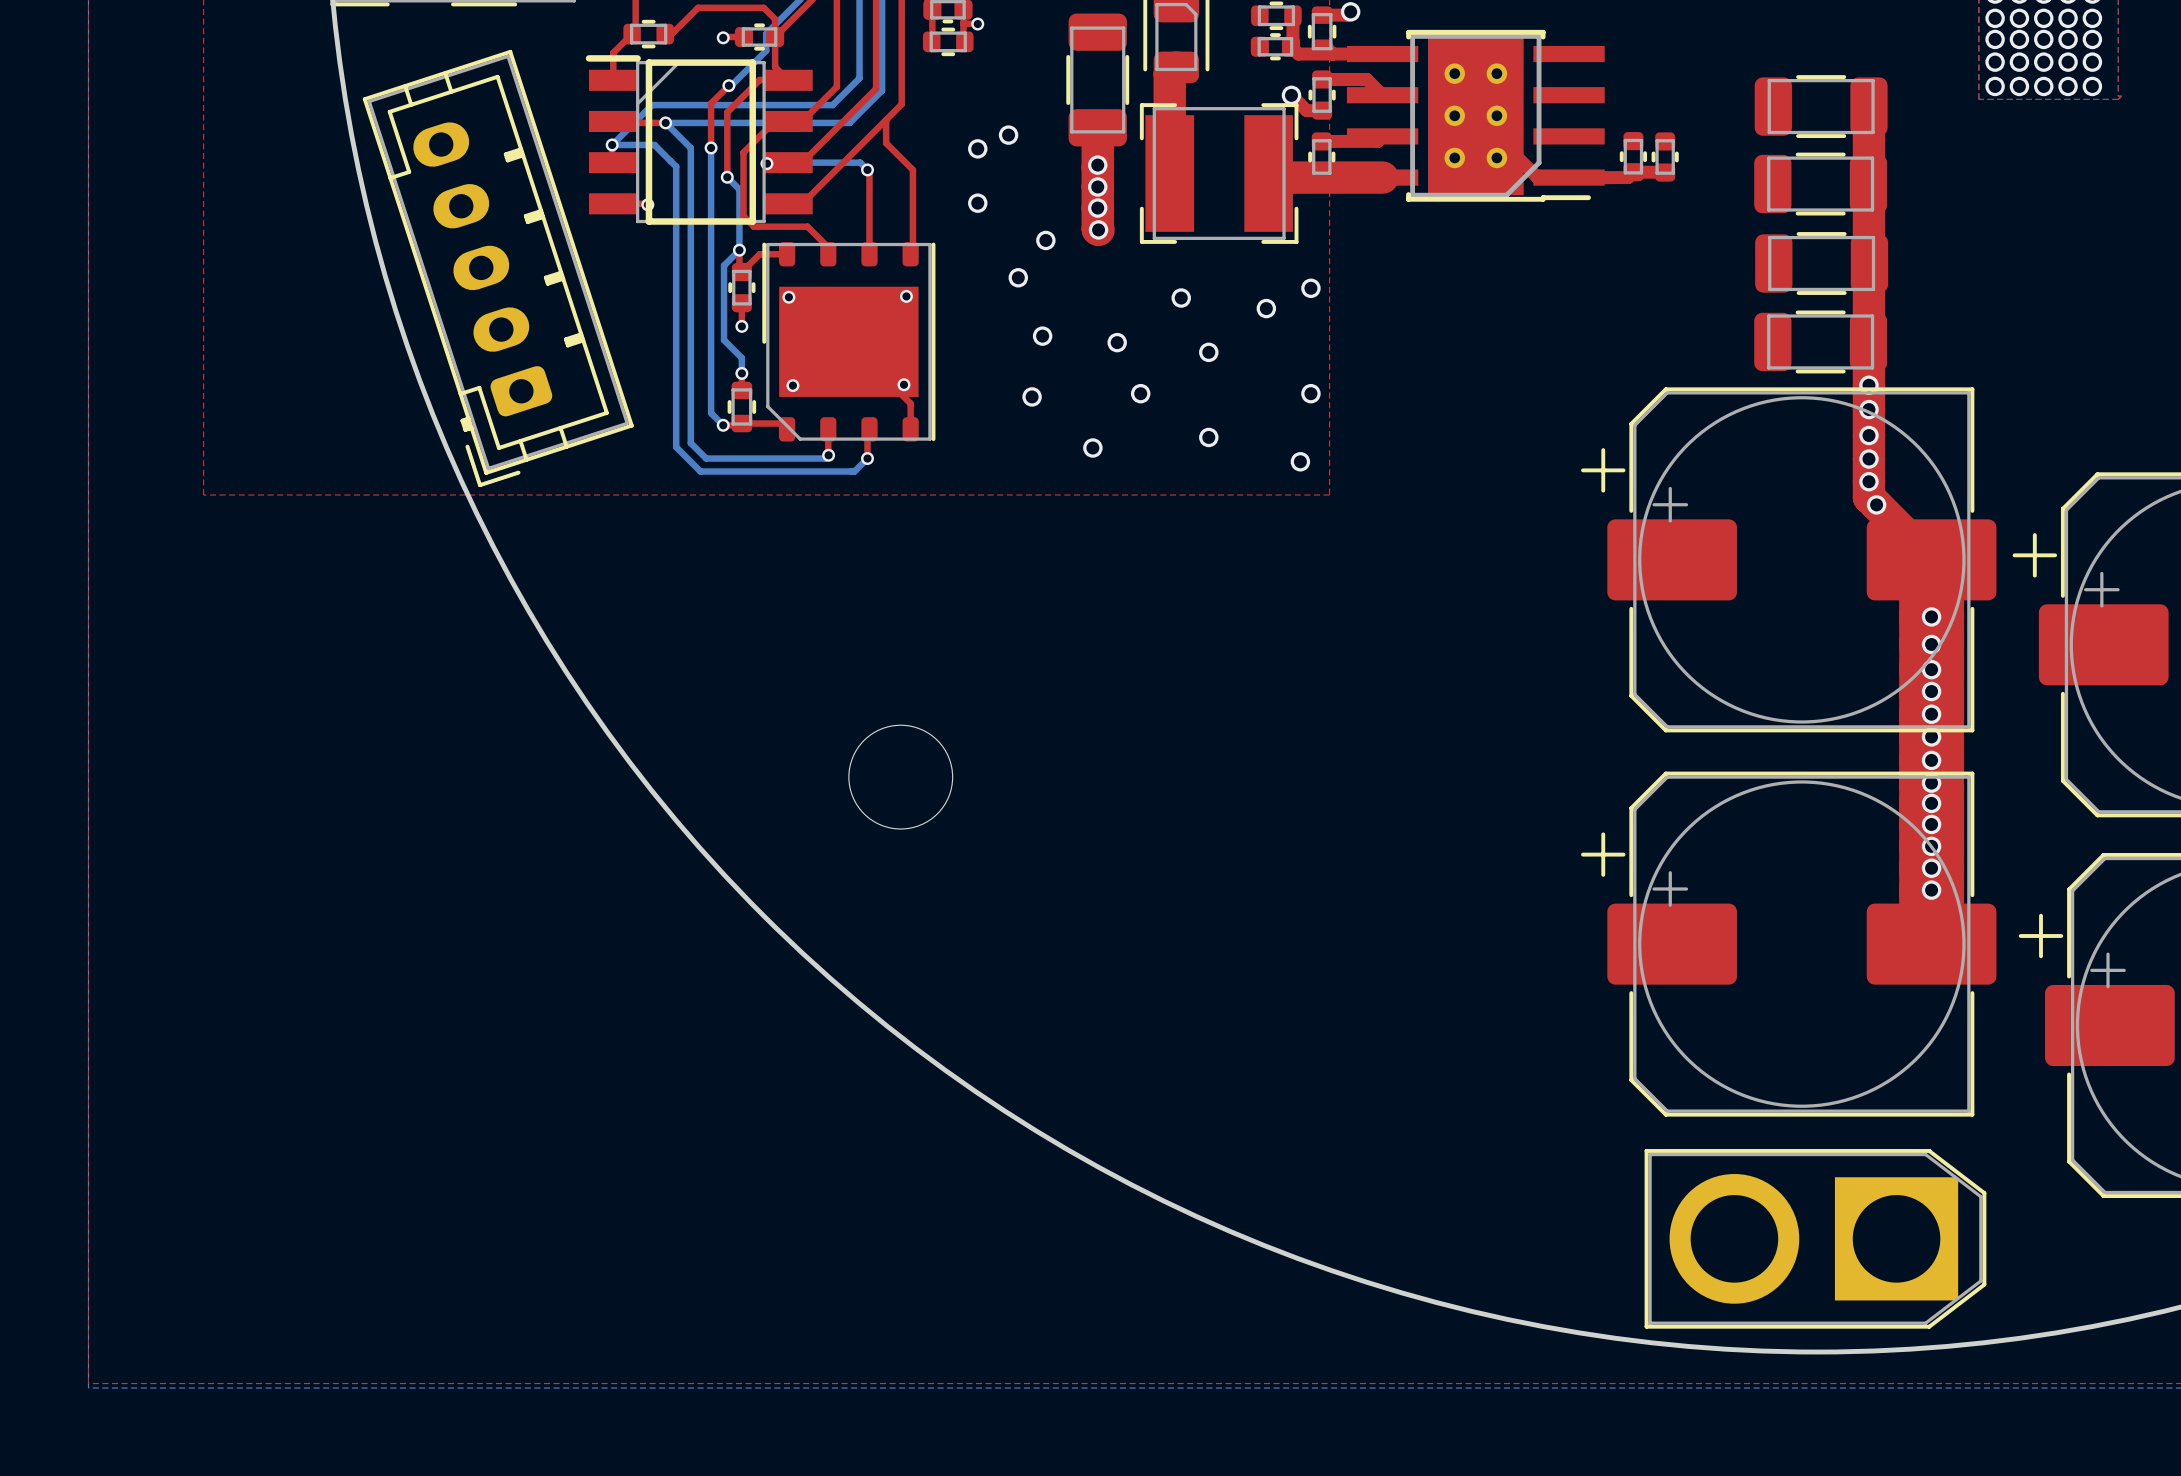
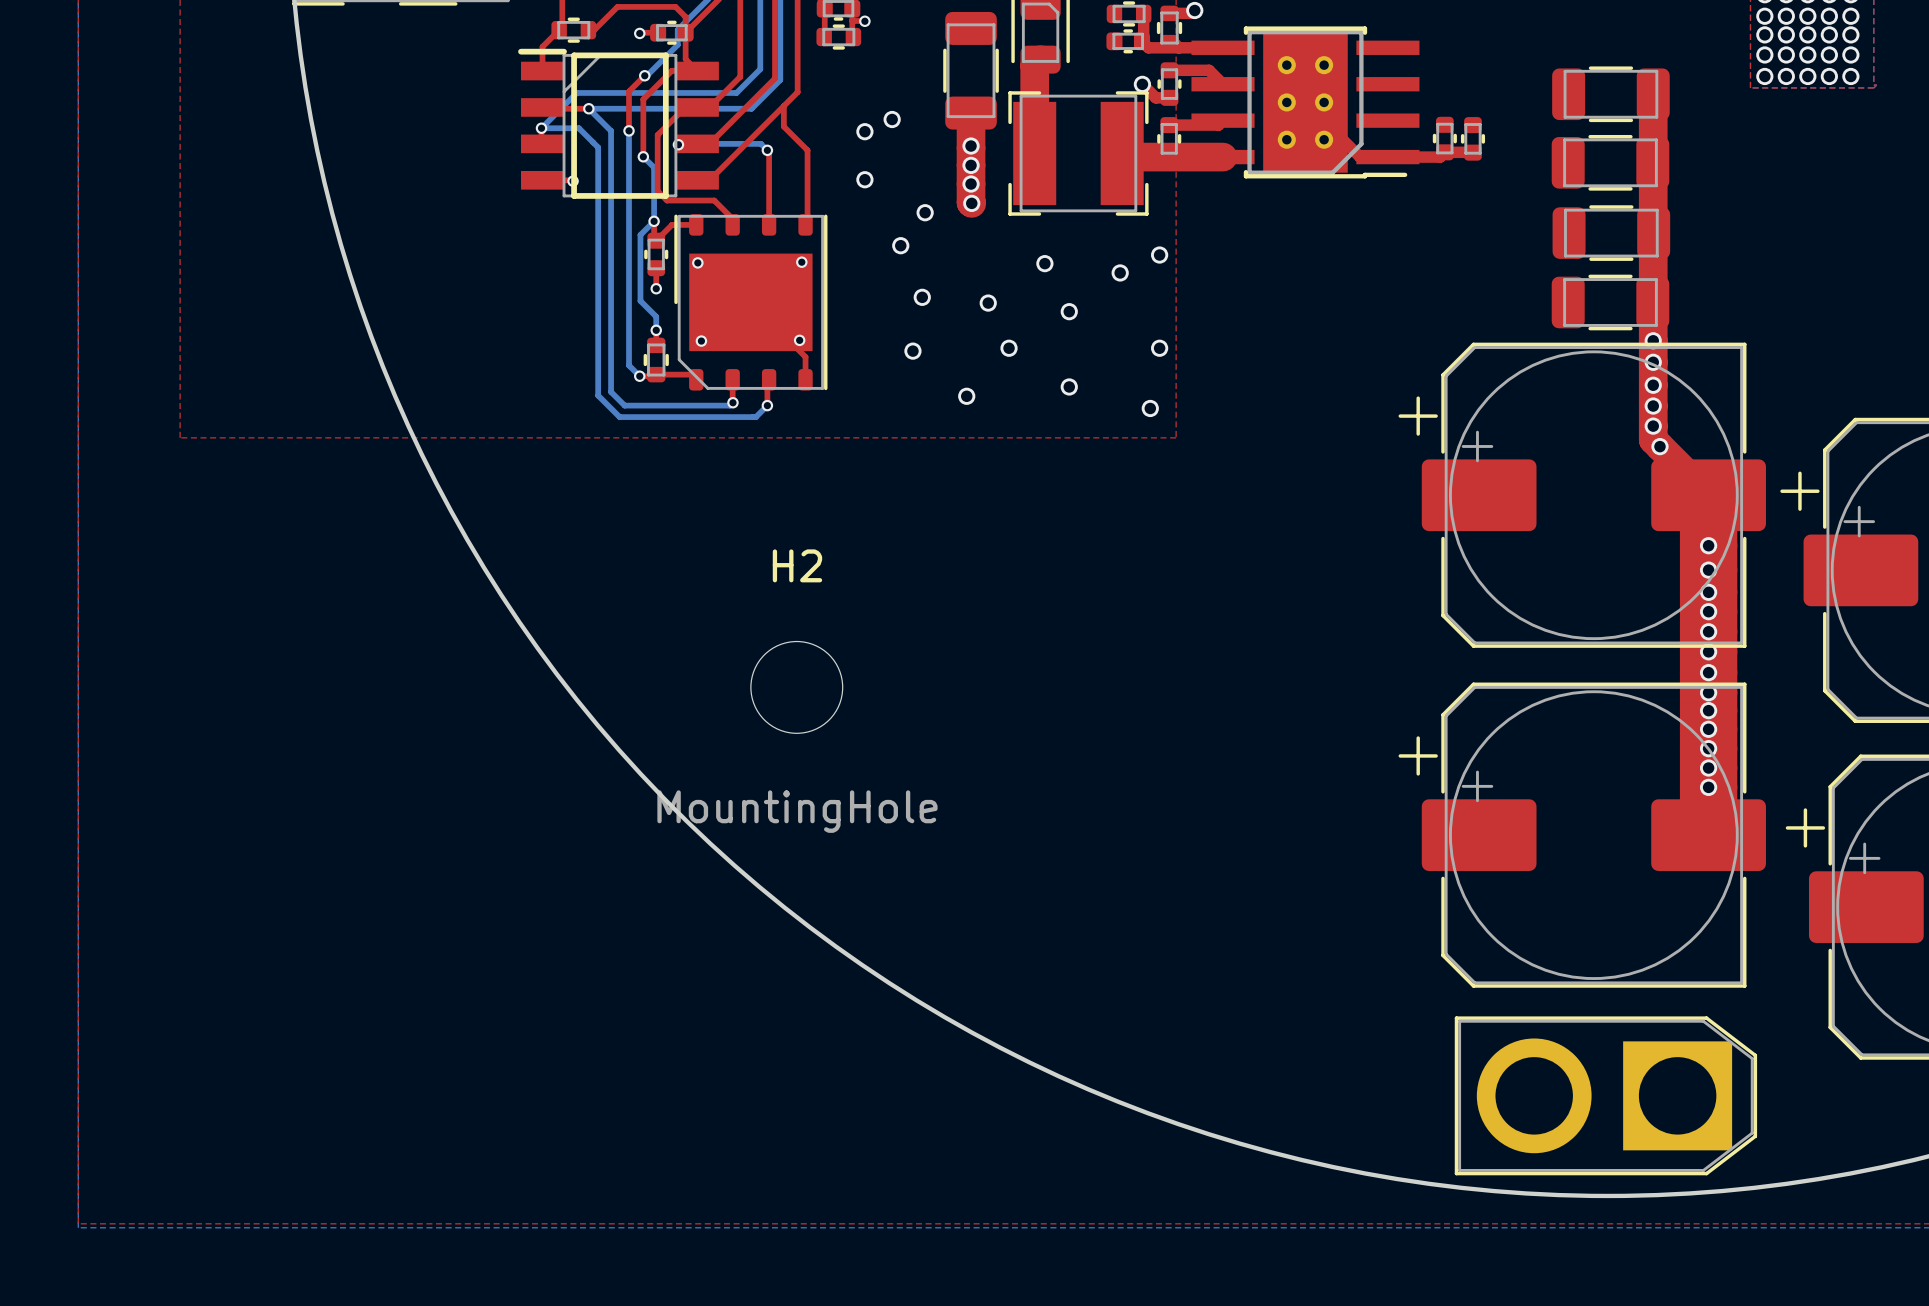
part: (498, 268) -> none
H2 name: none -> H2 (797, 565)
H2 value: none -> MountingHole (797, 811)

